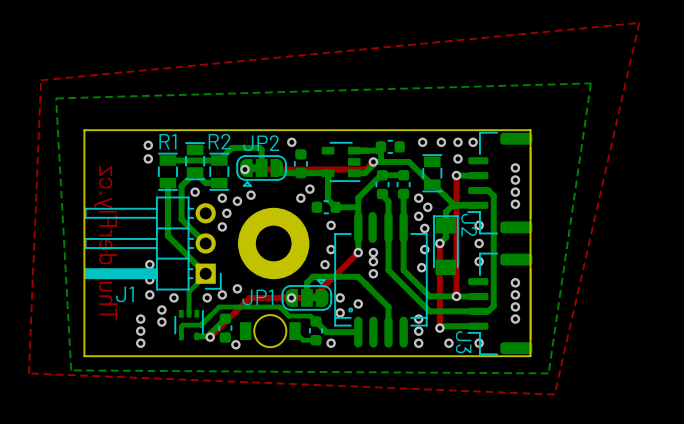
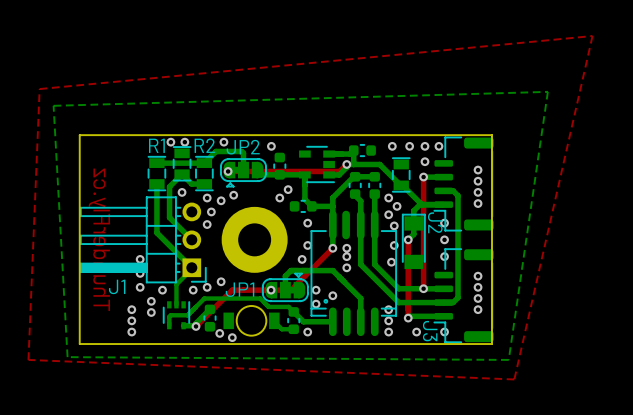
via: none -> (170, 142)
via: none -> (184, 142)
via: none -> (223, 142)
via: (148, 145) -> none
via: (148, 158) -> none
via: none -> (232, 337)

